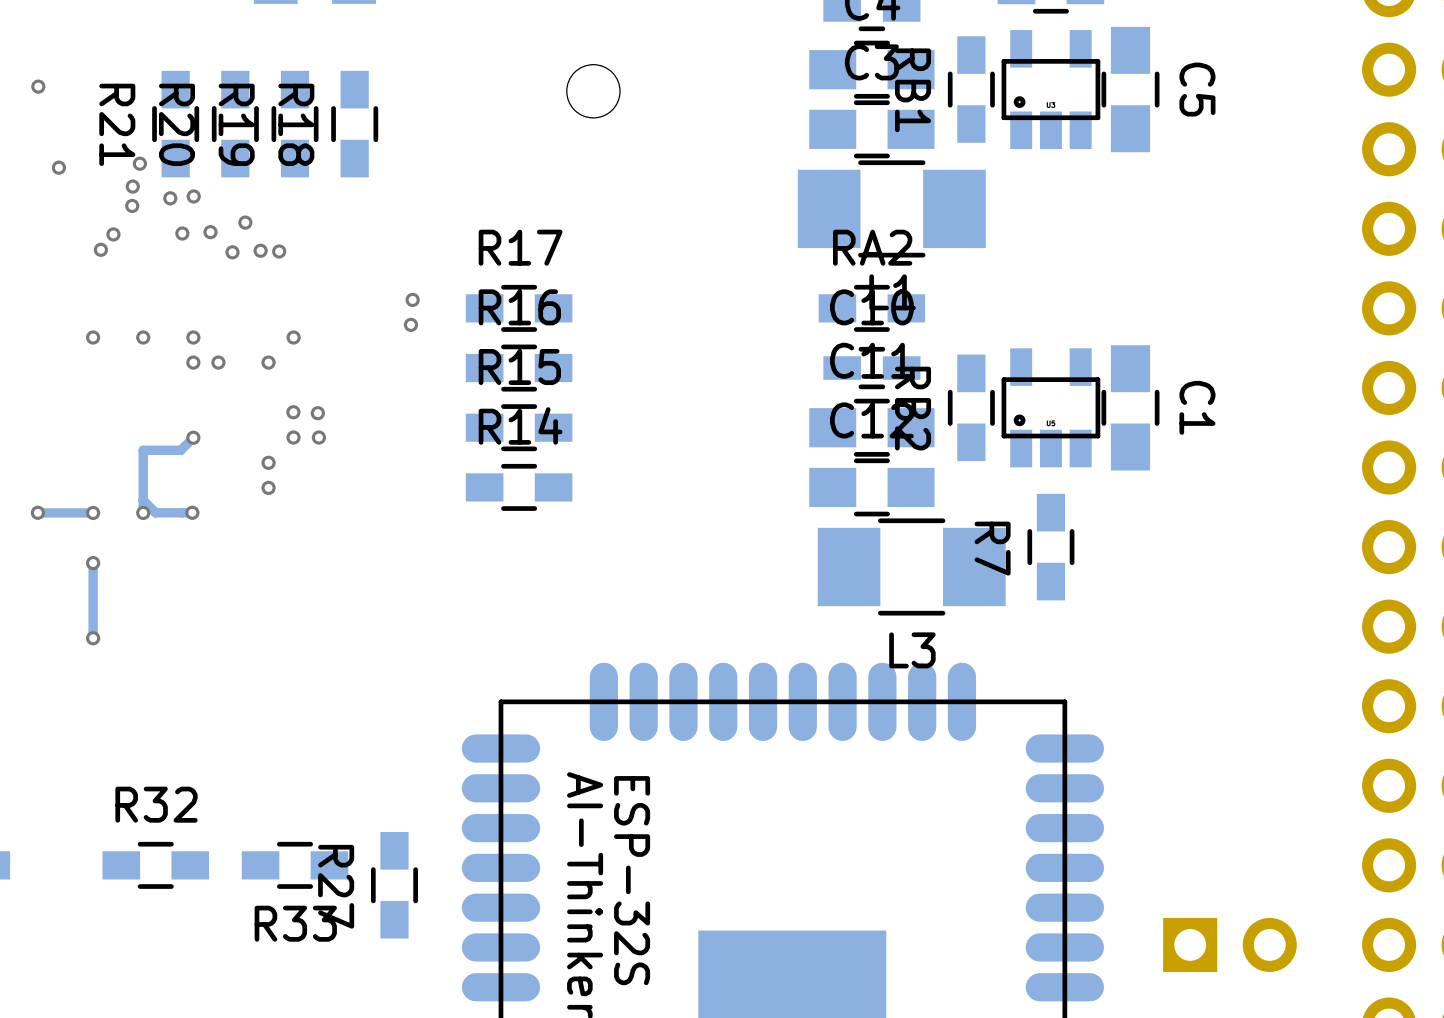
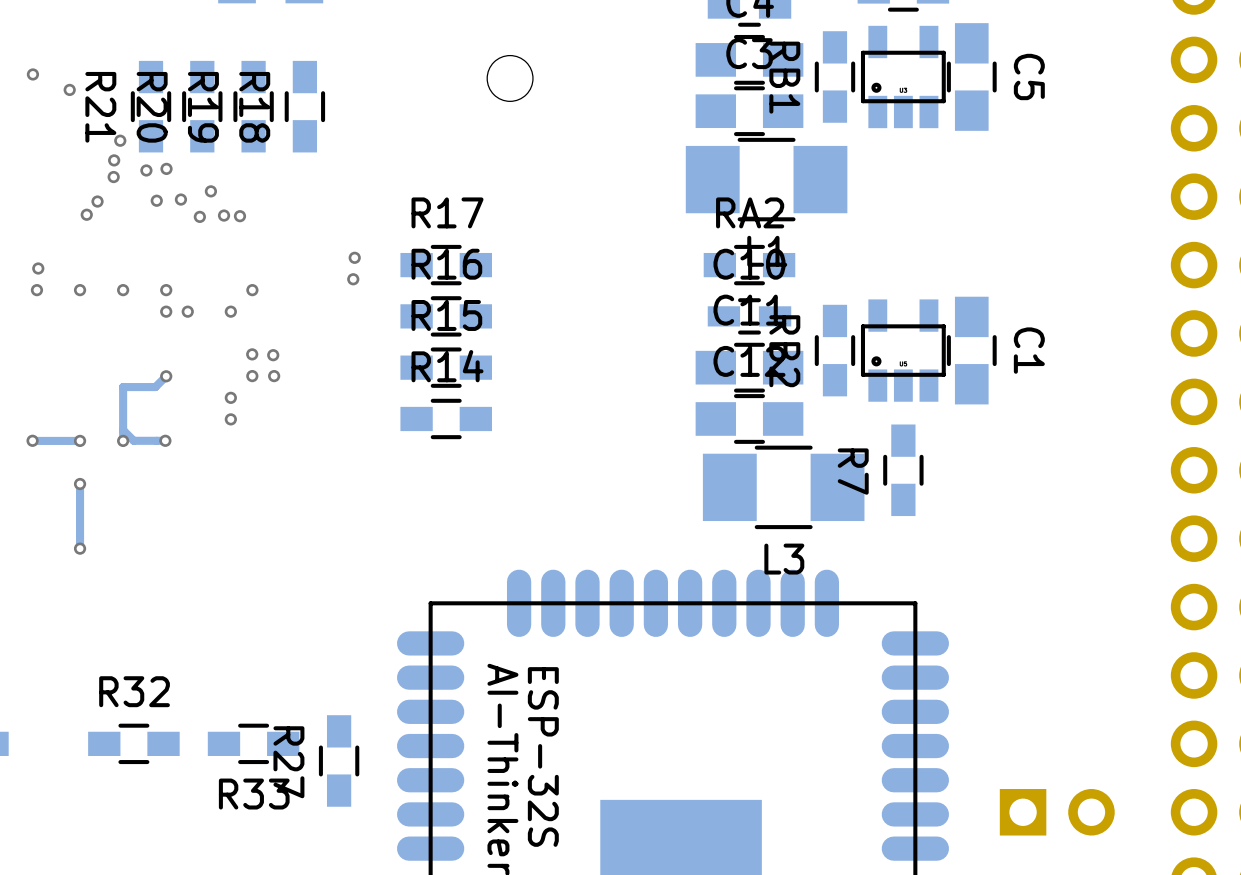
via: none -> (69, 89)
via: (58, 167) -> none
via: none -> (38, 268)
via: none -> (36, 290)

